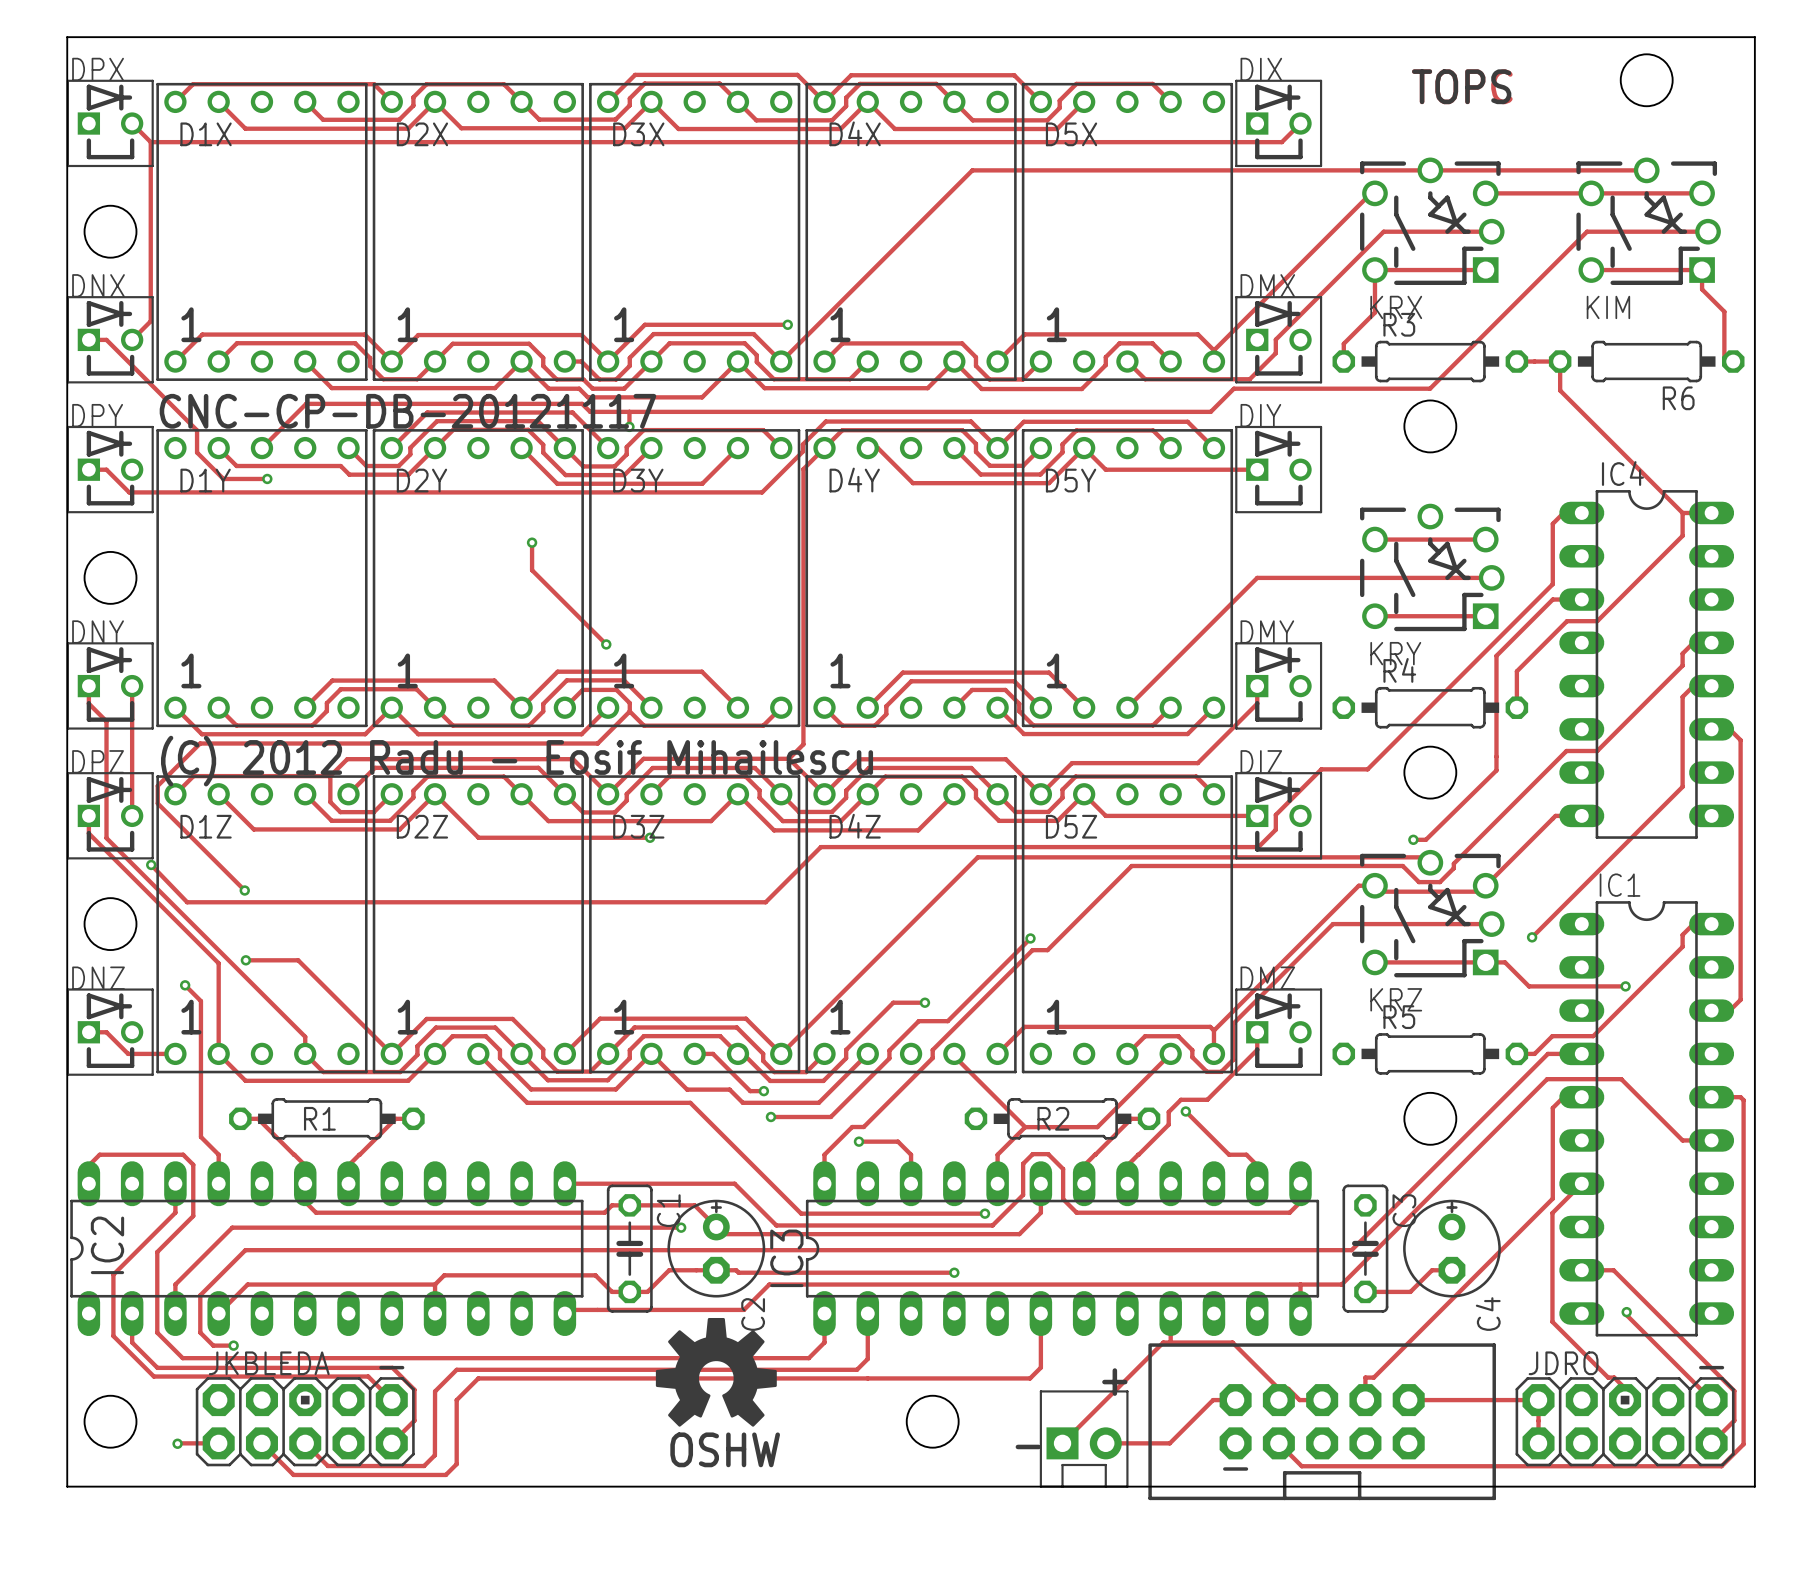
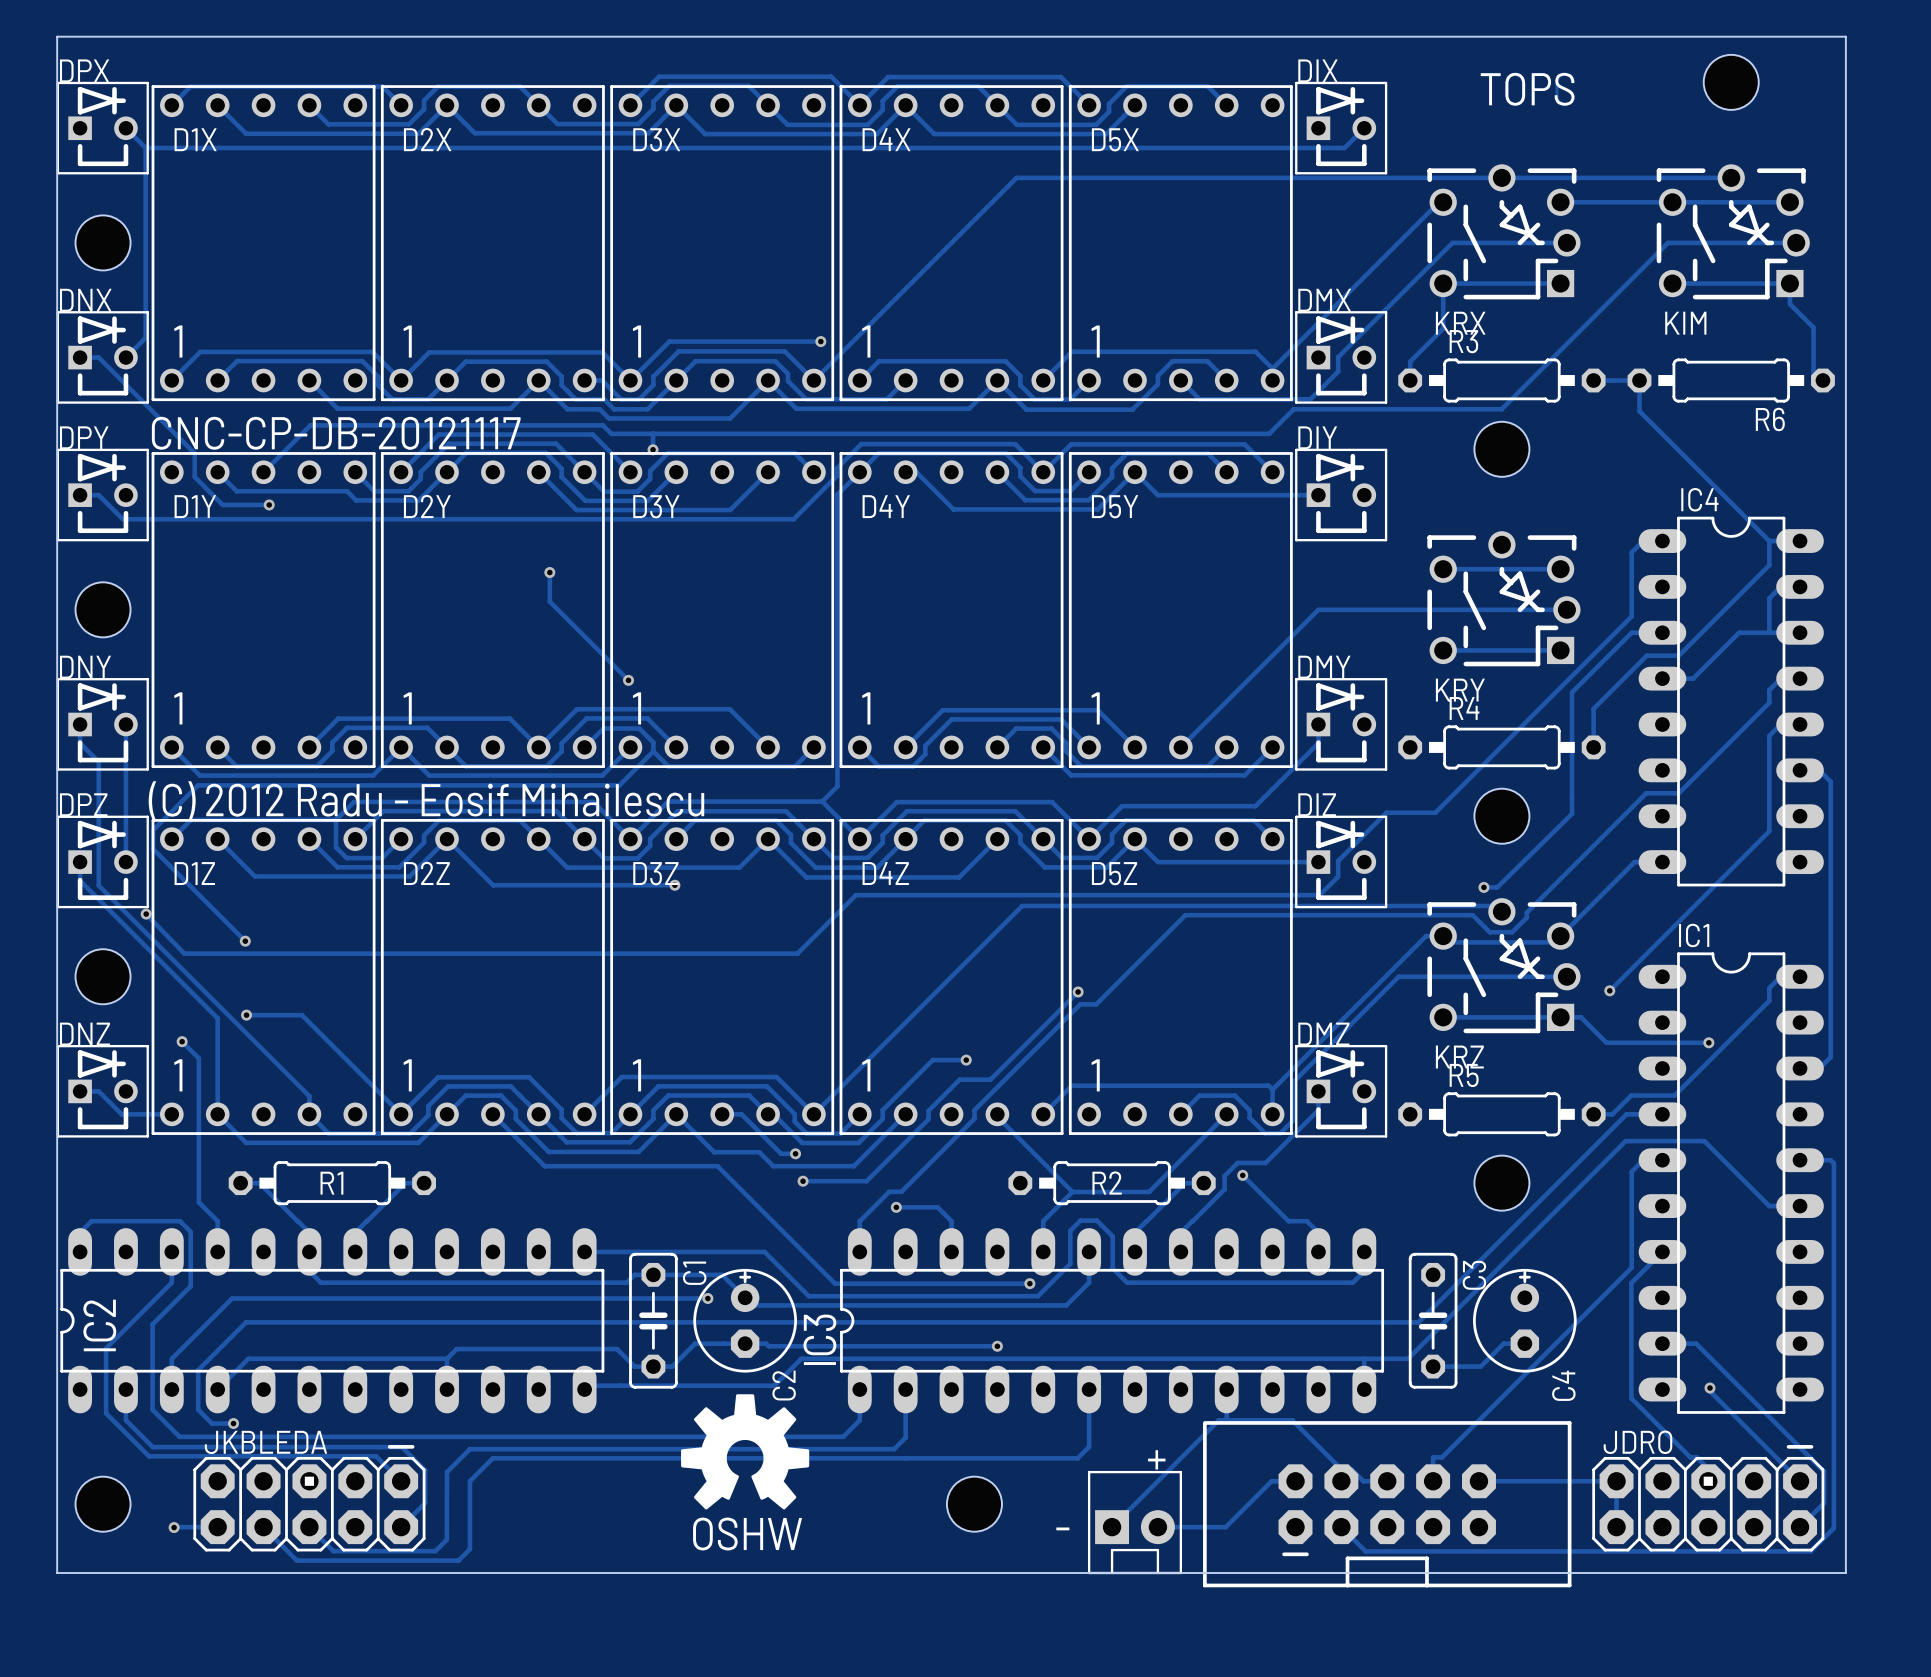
track: none -> (1800, 586) (1780, 586) (1769, 598) (1769, 632)
track: none -> (1800, 632) (1739, 632) (1693, 678) (1662, 678)

